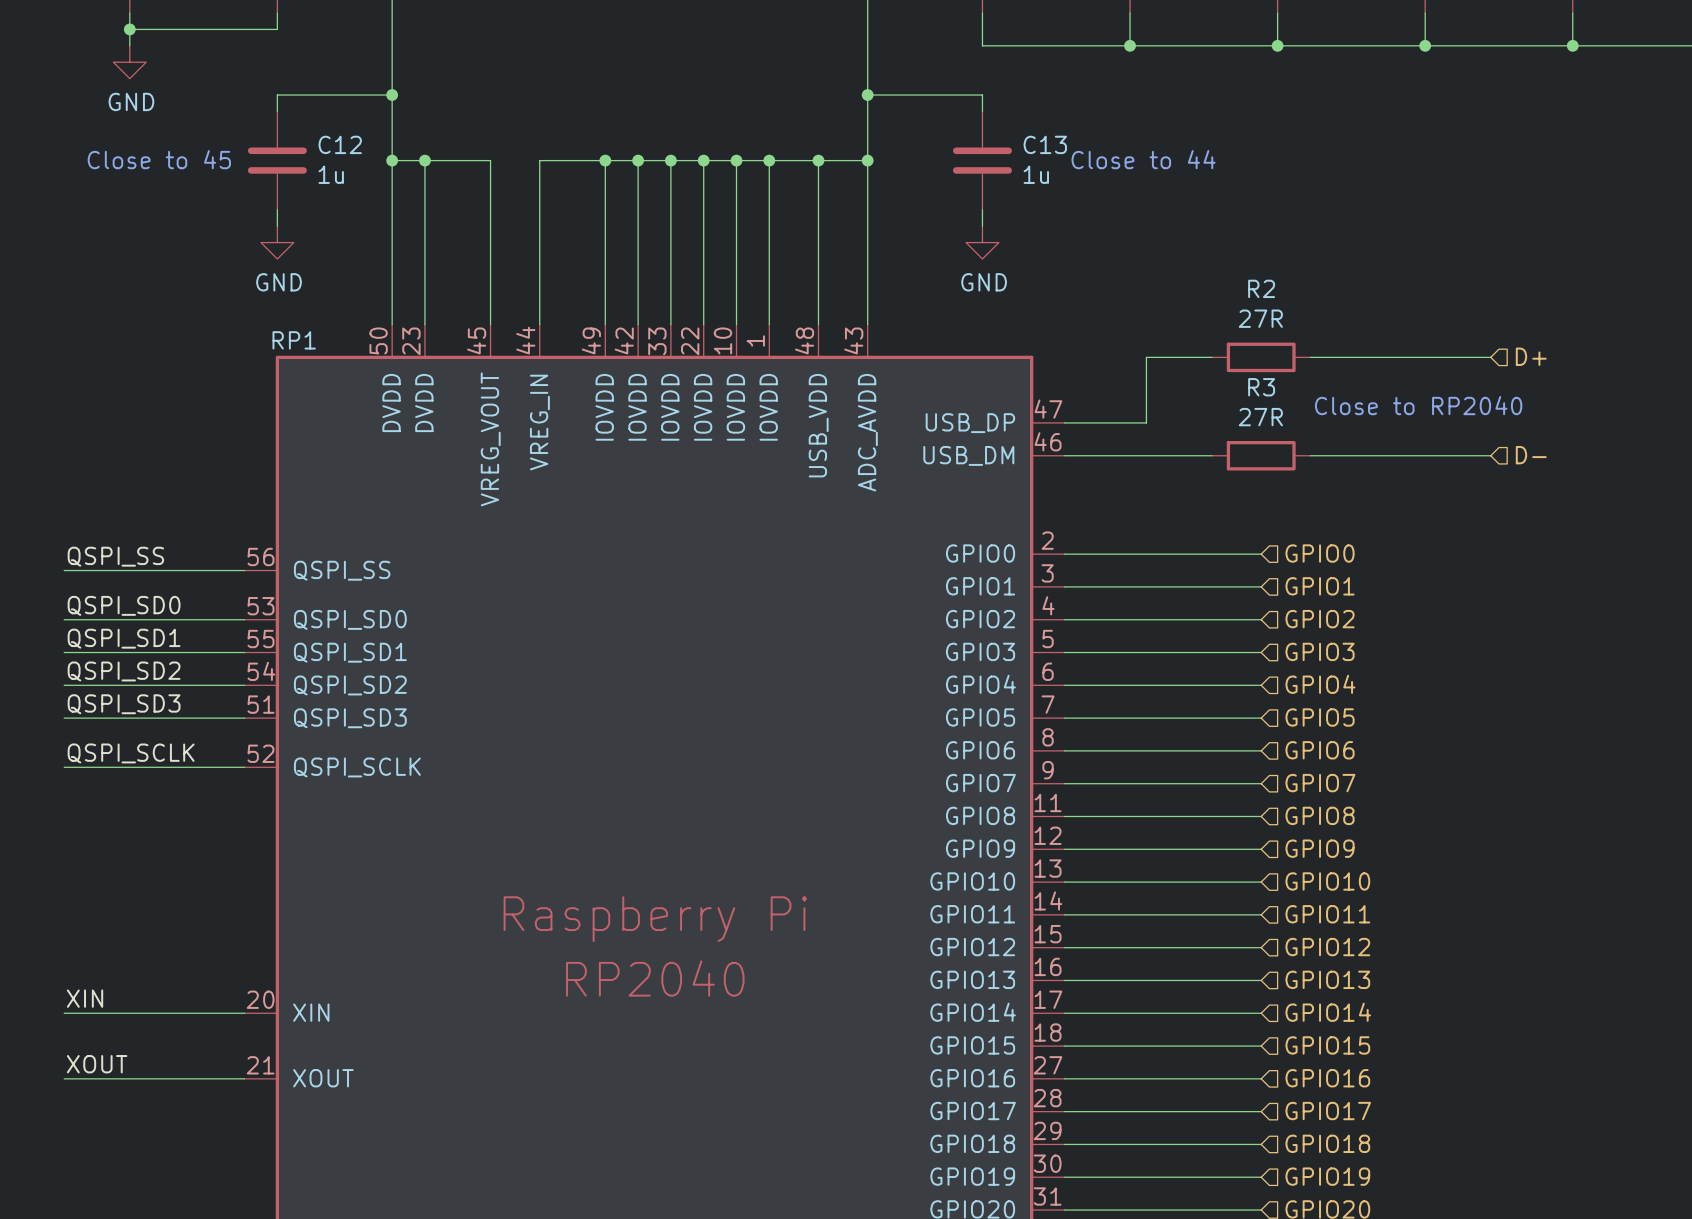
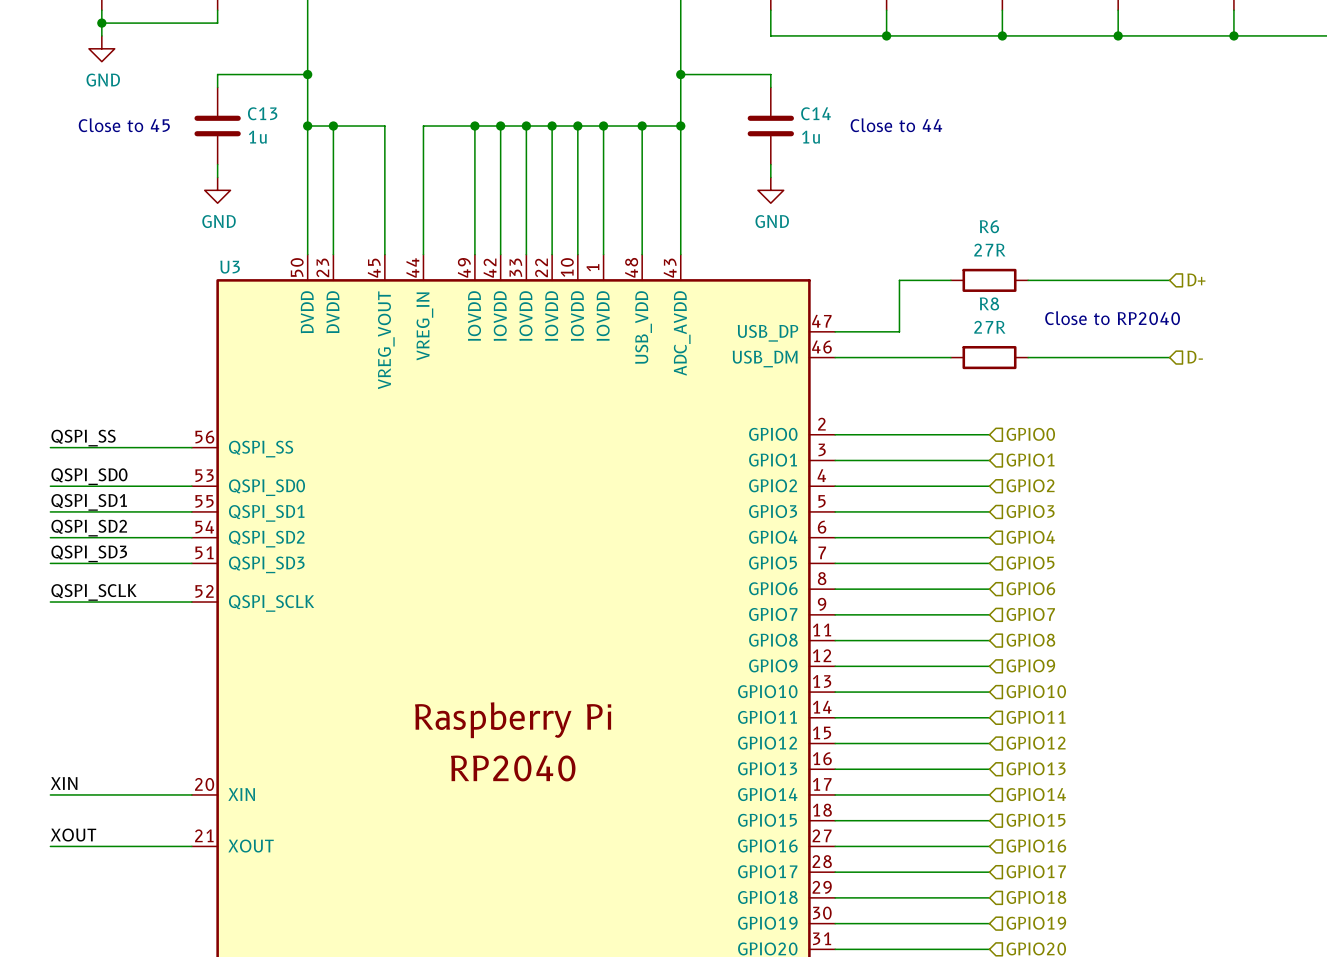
C12 name: C12 (340, 144) -> C13 (262, 113)
C13 name: C13 (1045, 144) -> C14 (816, 113)
R2 name: R2 (1261, 288) -> R6 (989, 226)
RP1 name: RP1 (294, 340) -> U3 (230, 267)
R3 name: R3 (1261, 387) -> R8 (989, 303)

